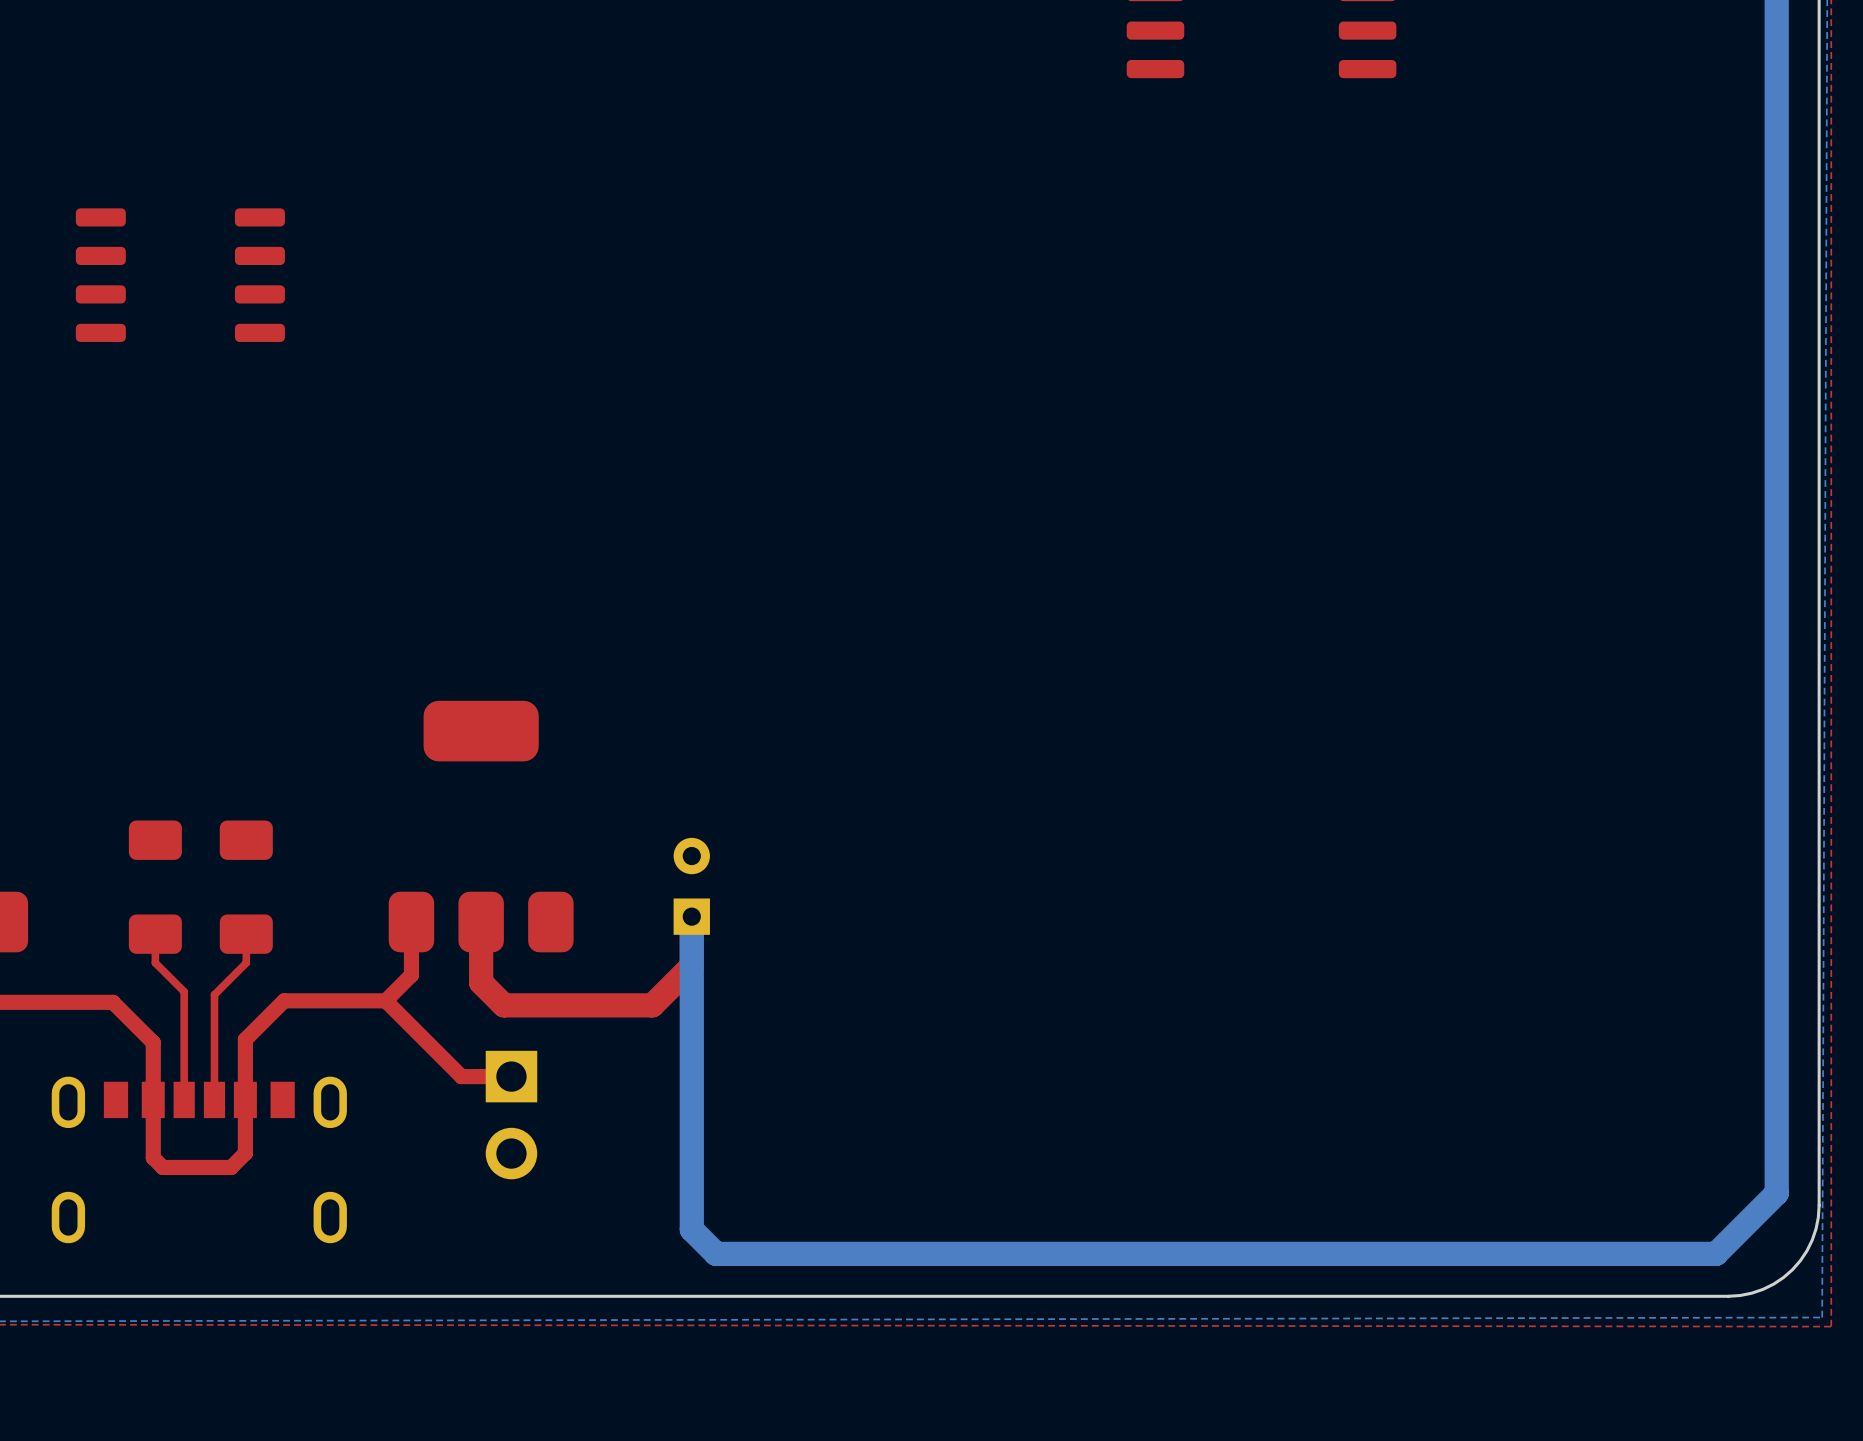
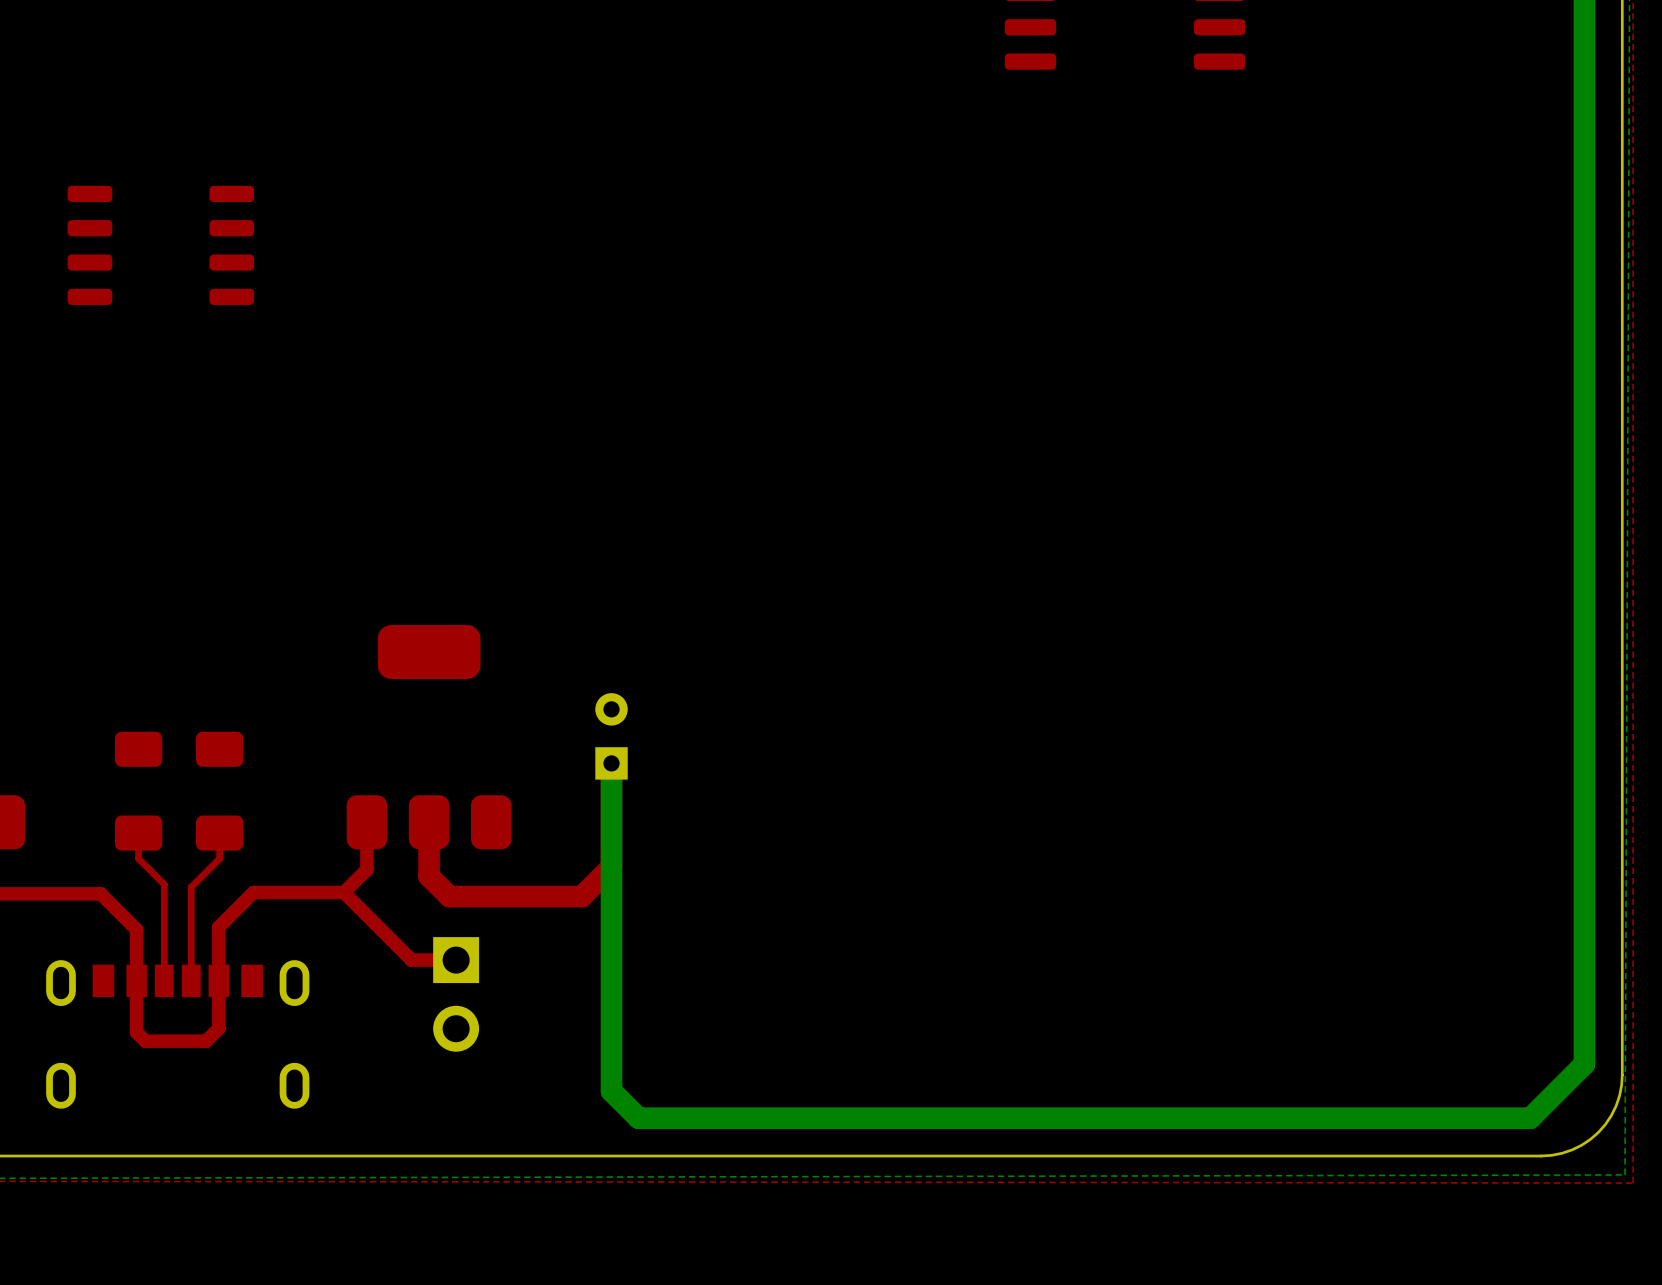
part position: (691, 886) -> (611, 736)
bottom track: (691, 916) (691, 1229) -> (611, 763) (611, 1091) (616, 1096)

